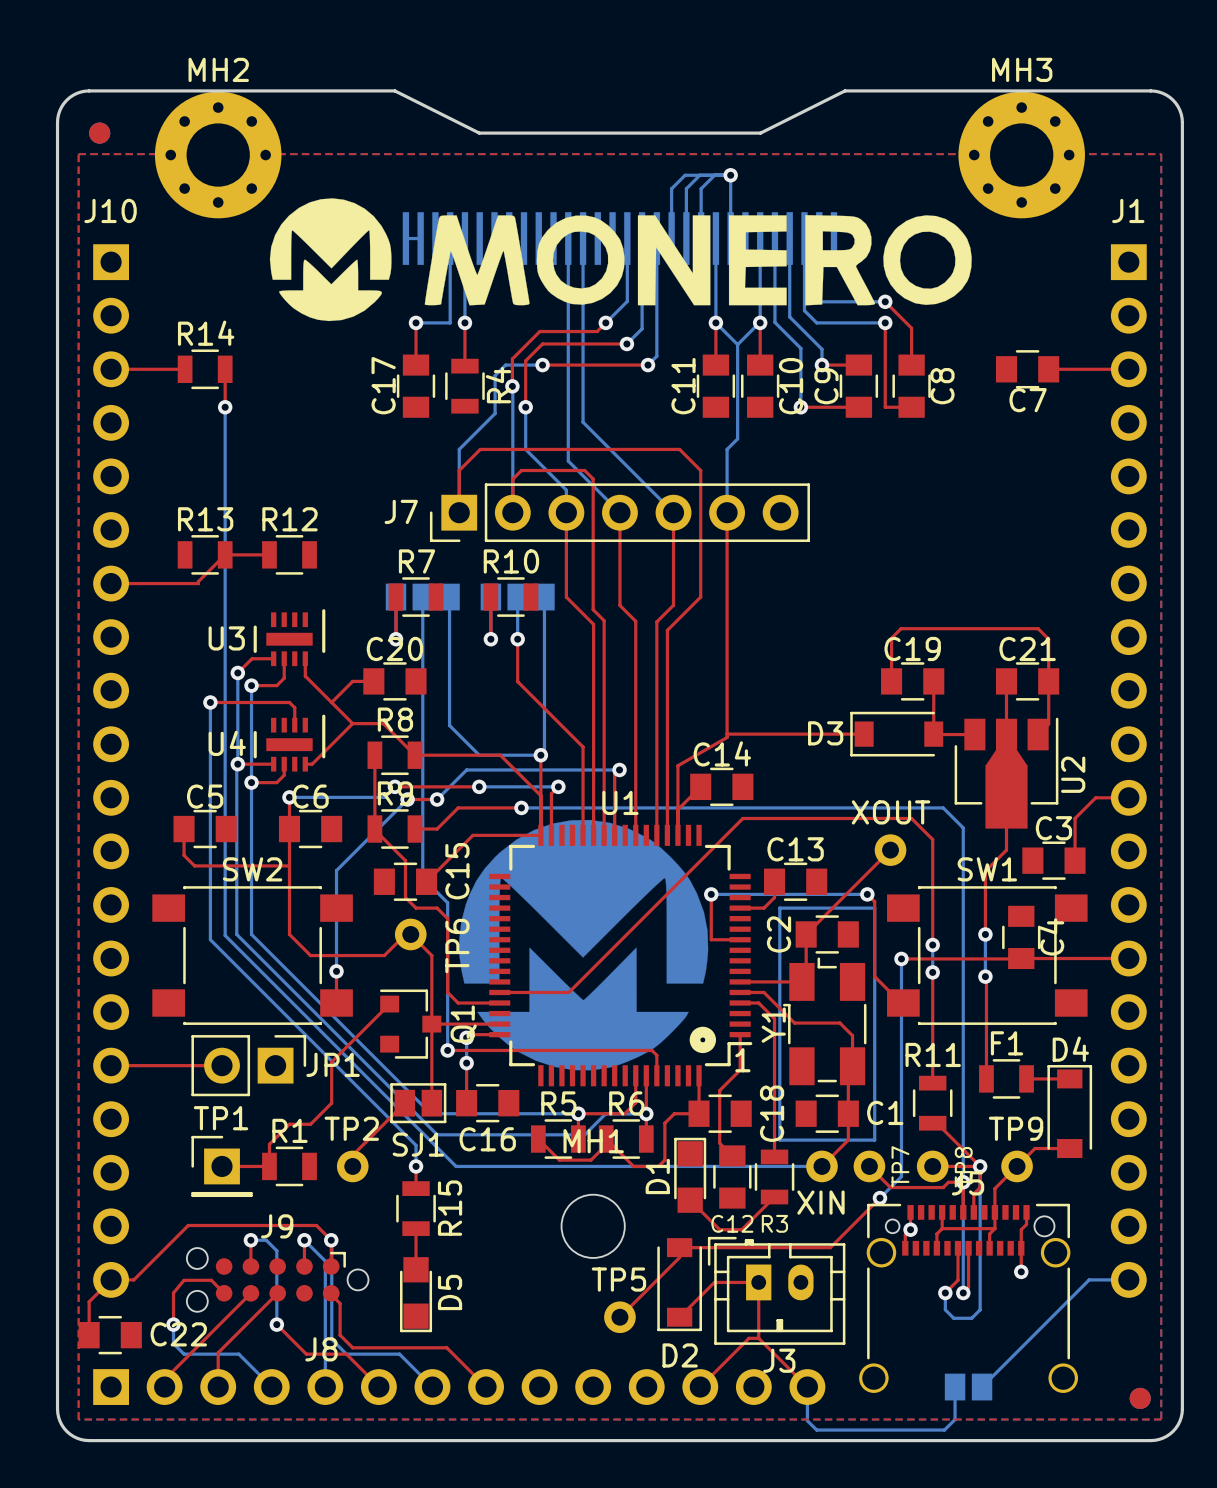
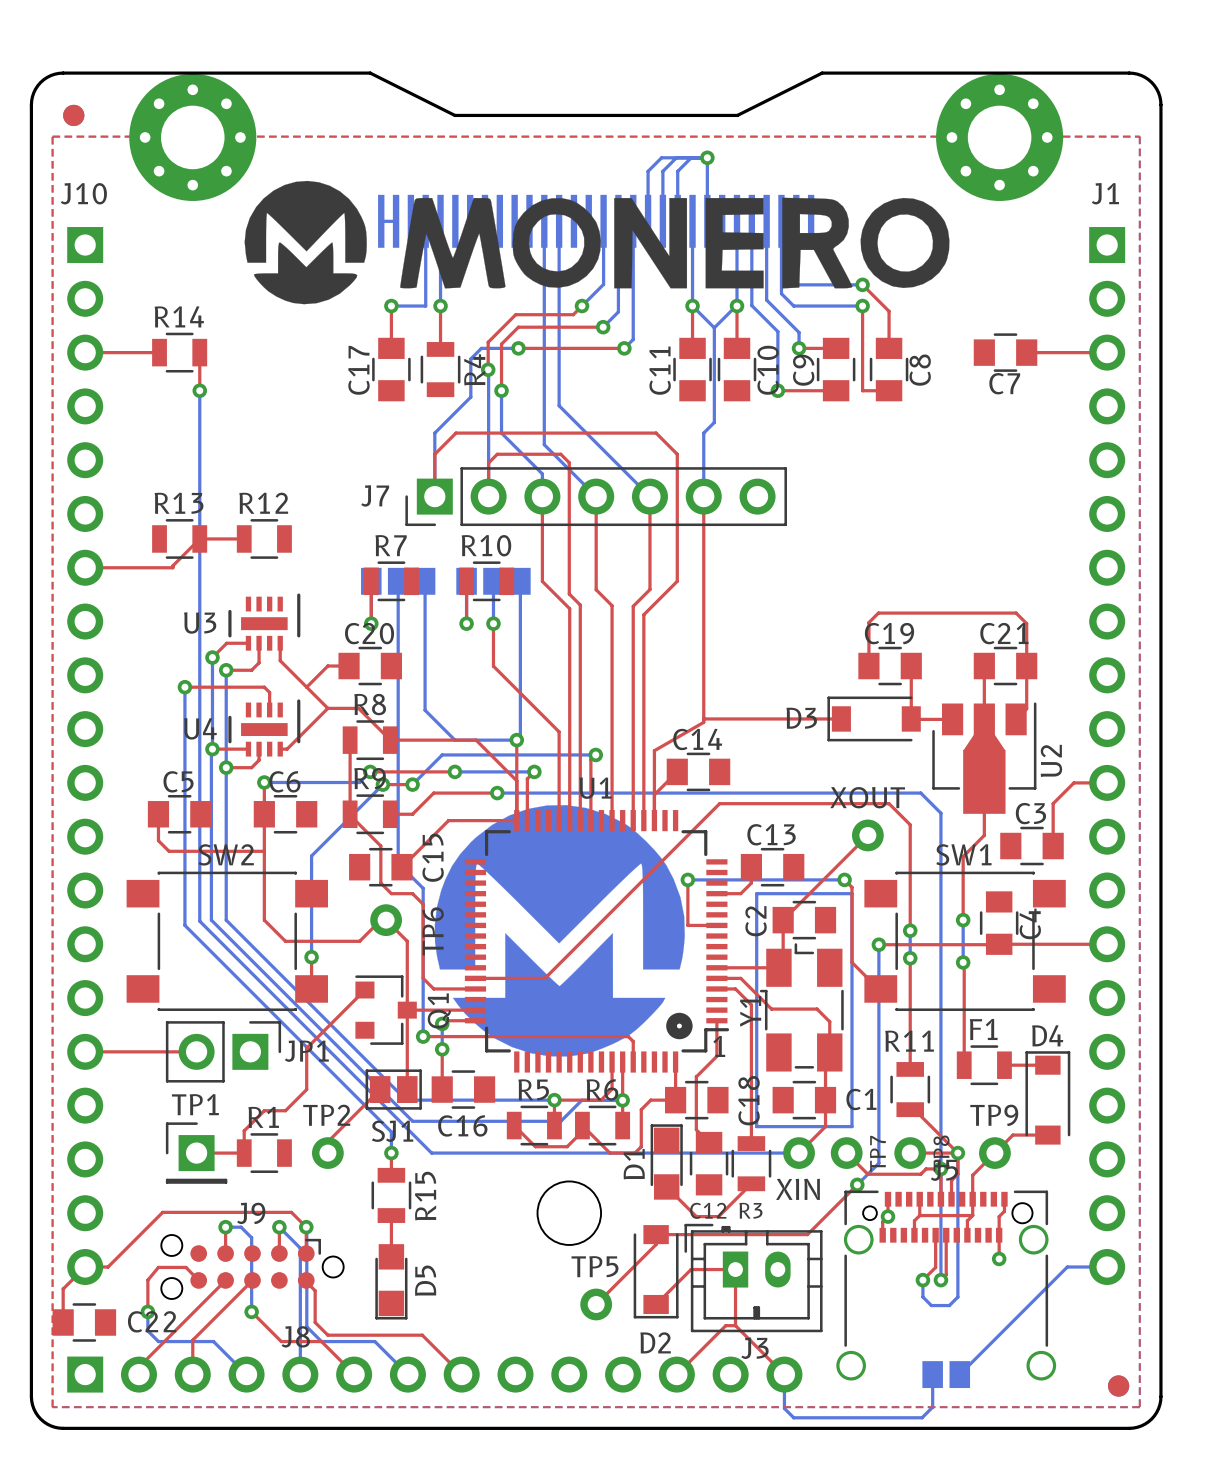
MH2 name: MH2 (218, 69) -> none
MH3 name: MH3 (1022, 69) -> none
MH1 name: MH1 (593, 1141) -> none

